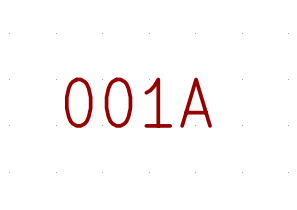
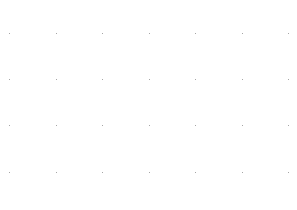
text: 001A (138, 102) -> none

